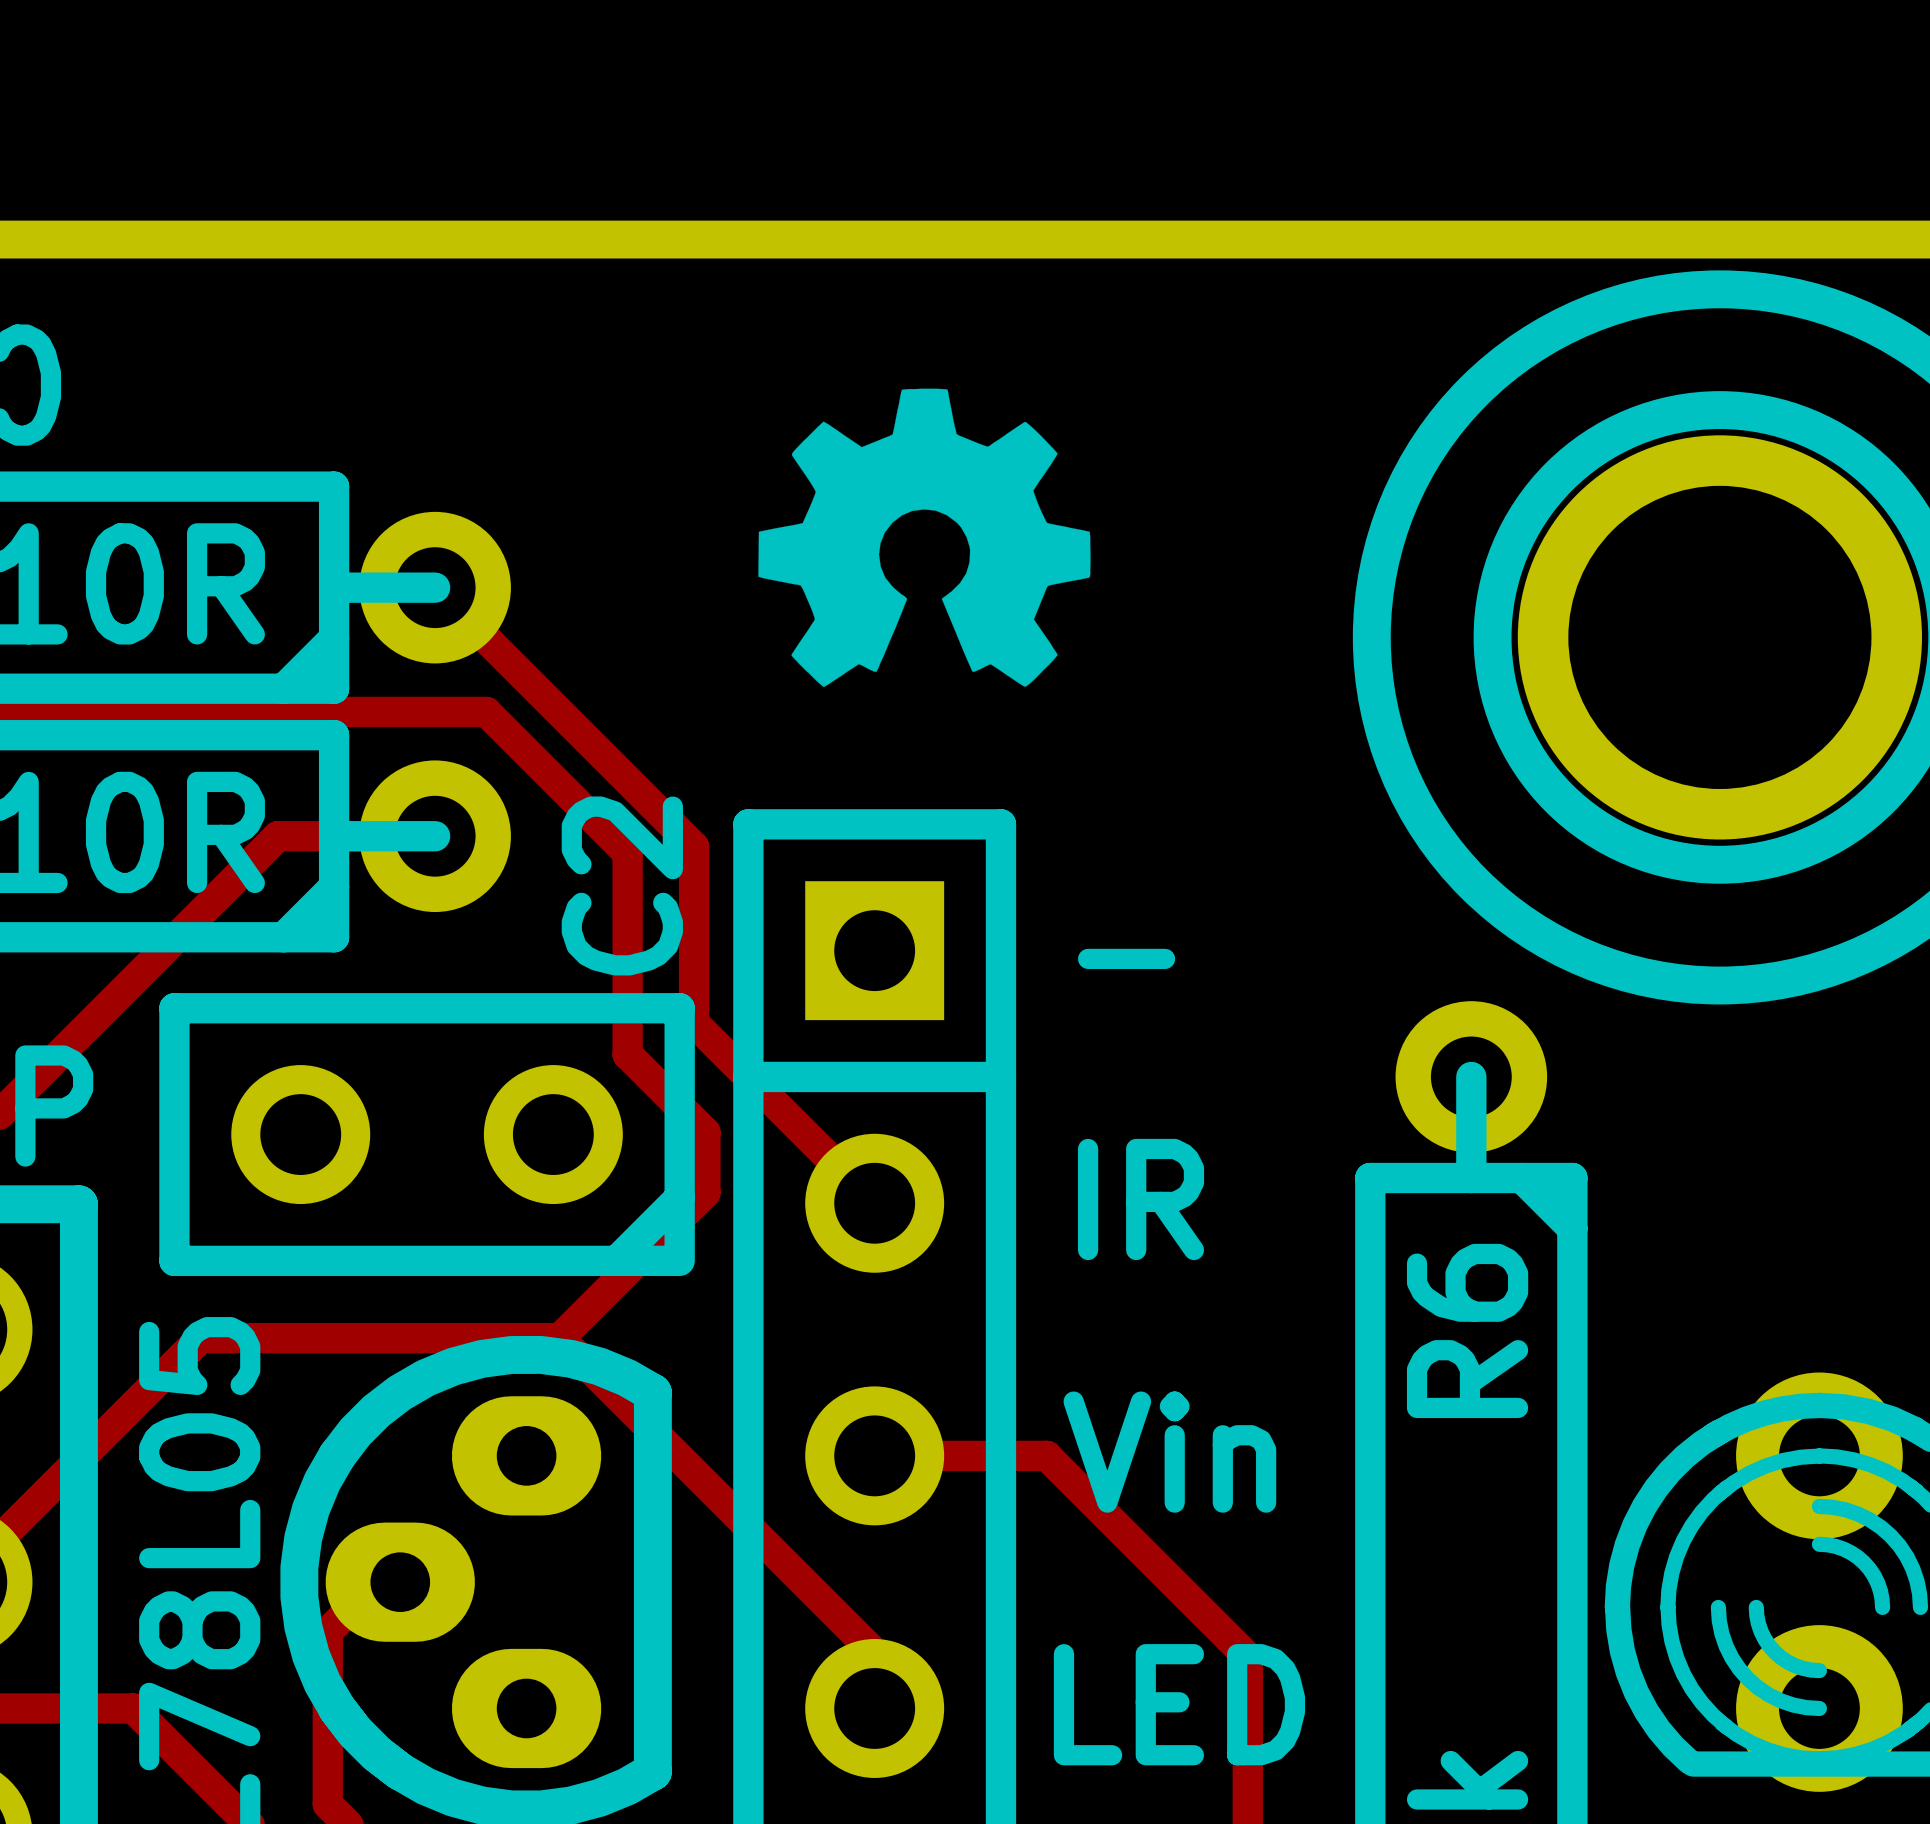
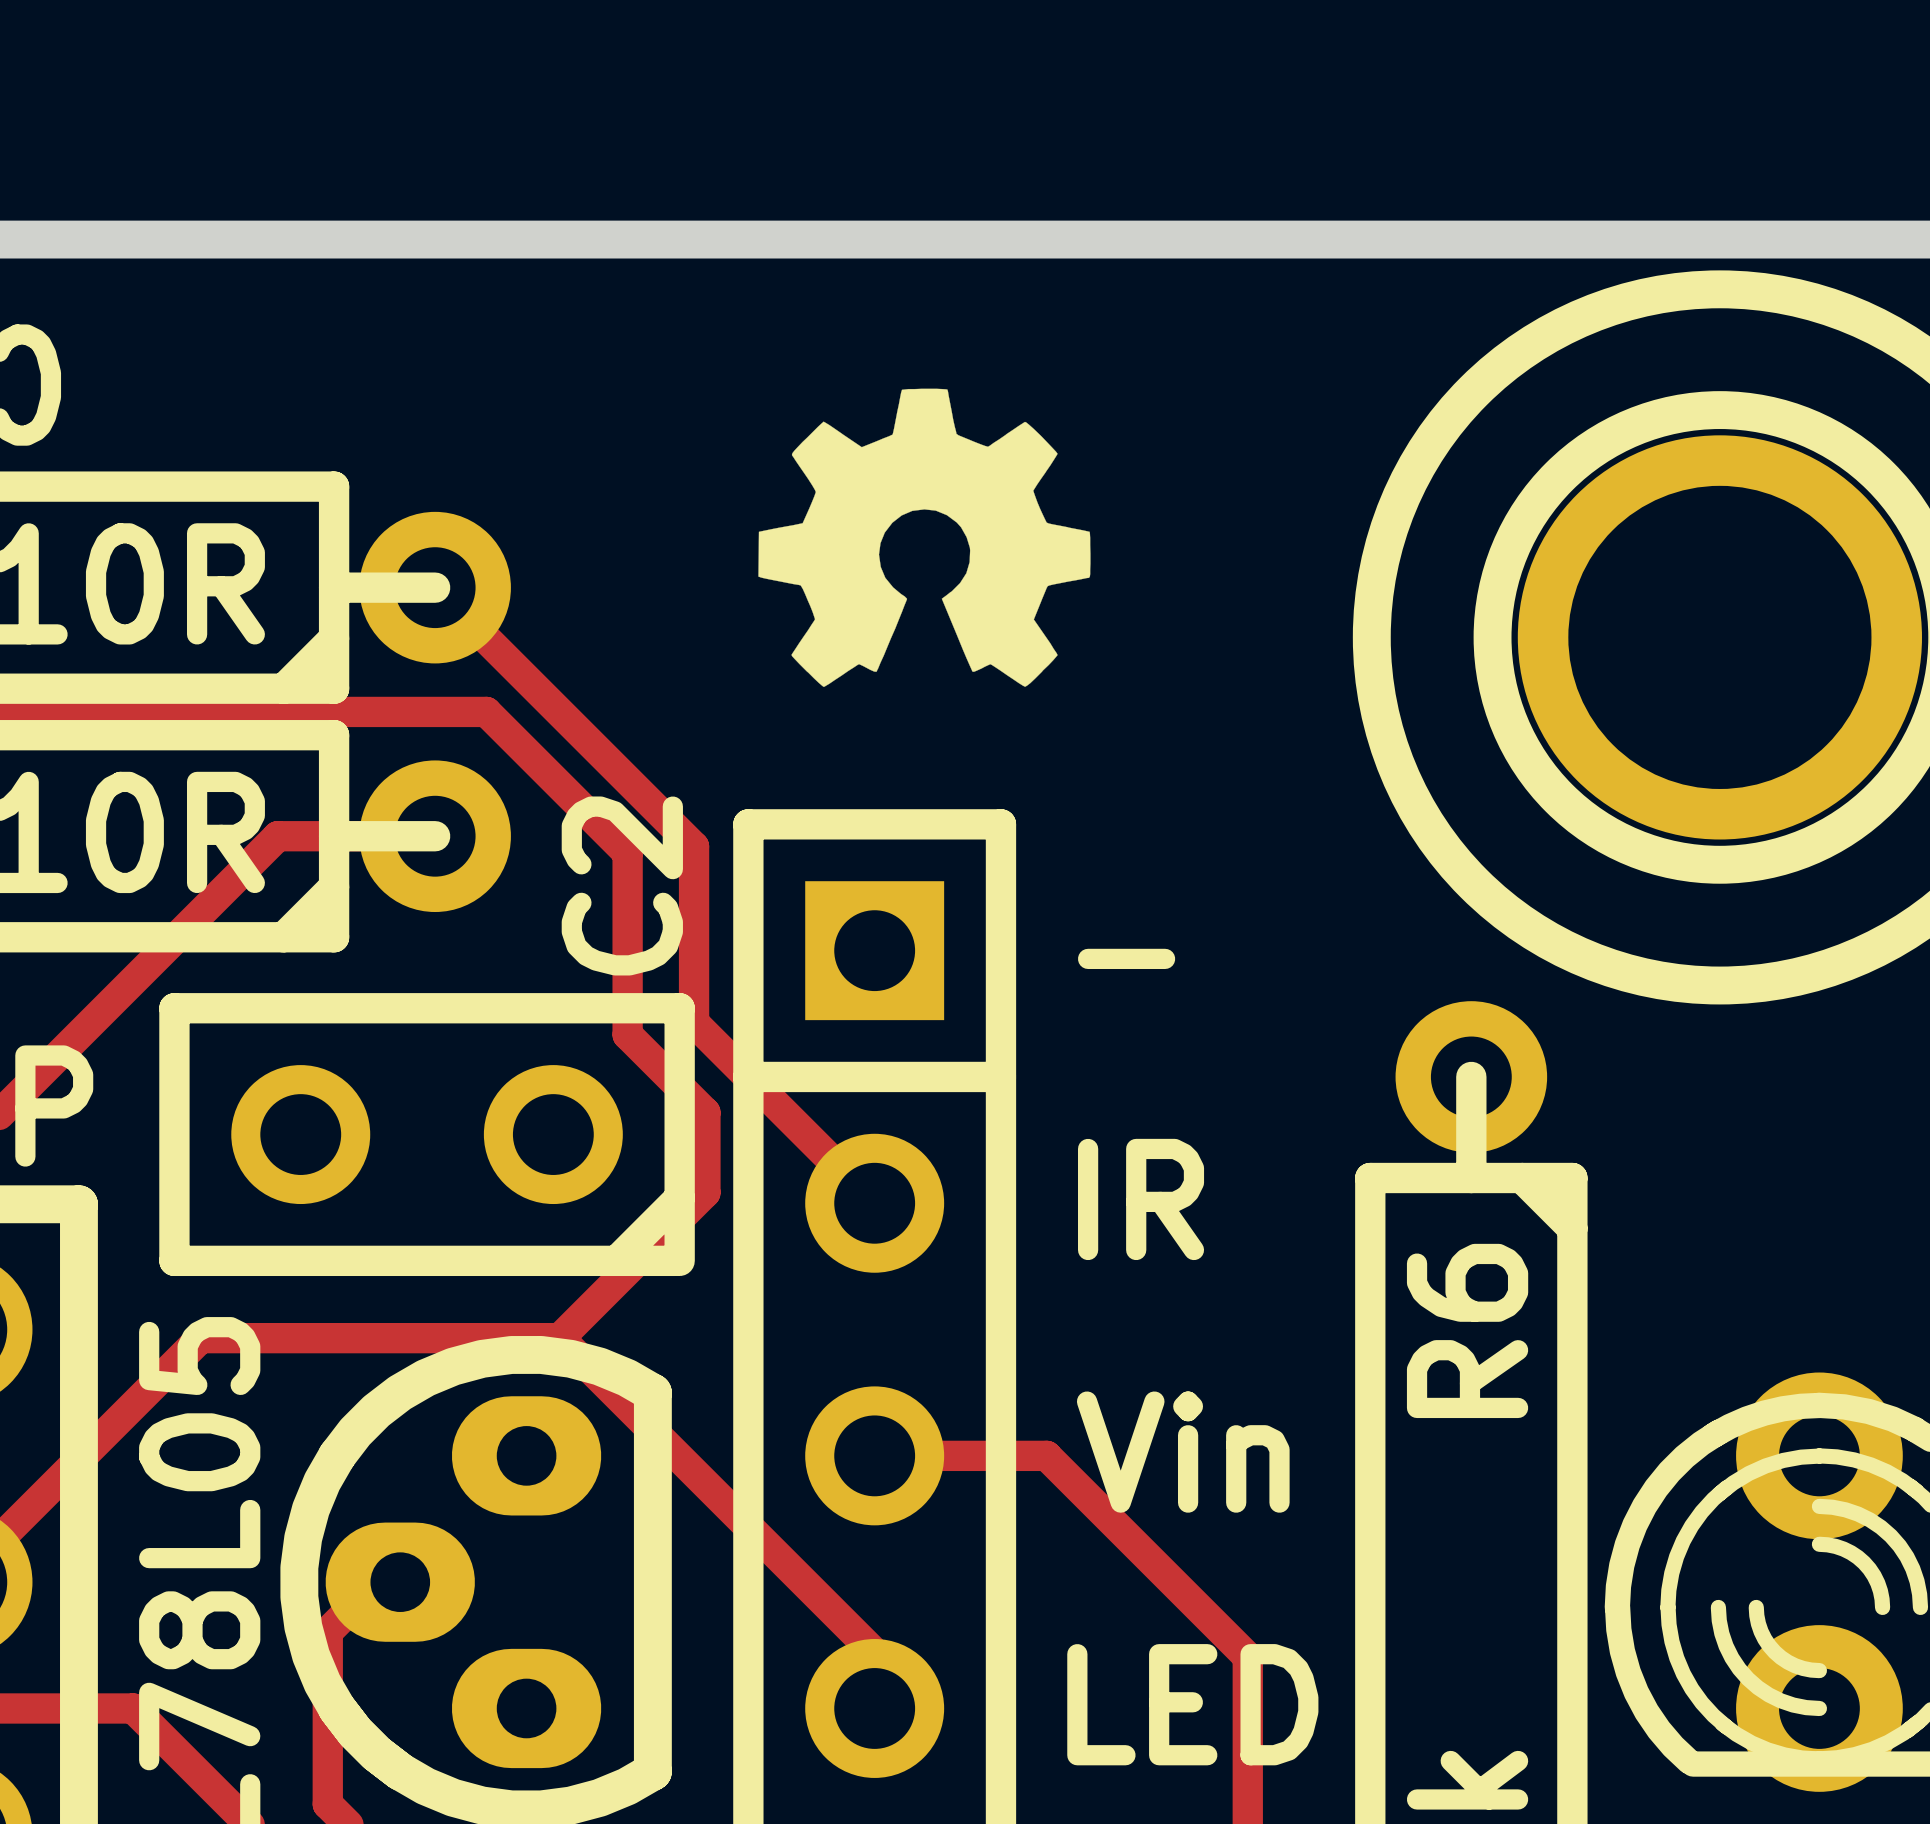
track: (627, 1034) (627, 1054) (705, 1132) -> (627, 1034) (705, 1112) (705, 1132)
text position: Vin (1169, 1452) -> Vin (1183, 1452)
text position: LED (1179, 1704) -> LED (1192, 1704)

